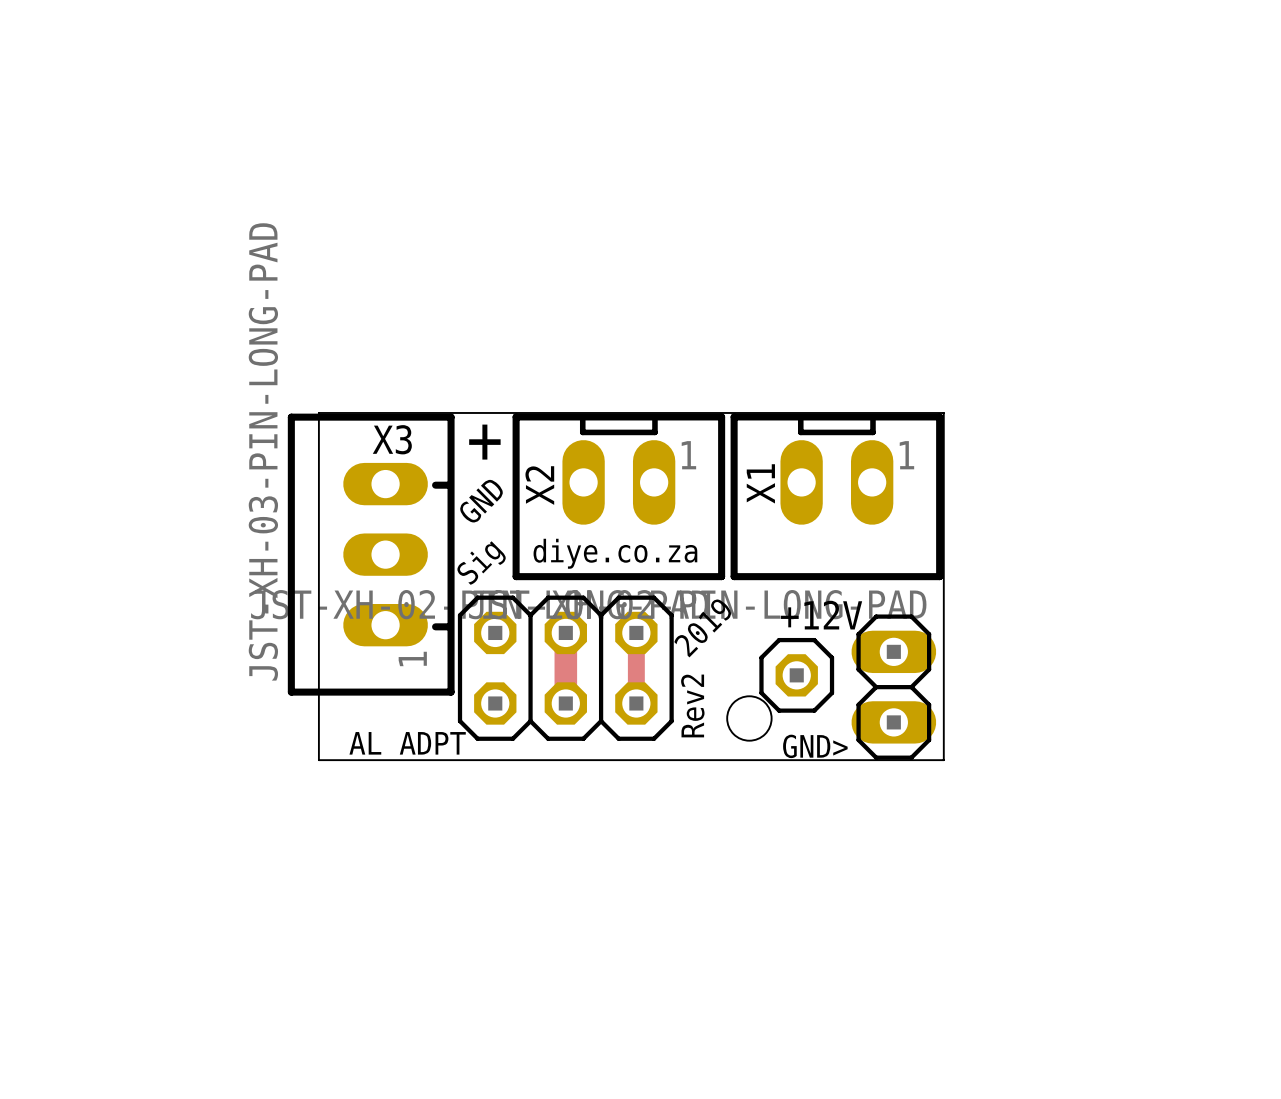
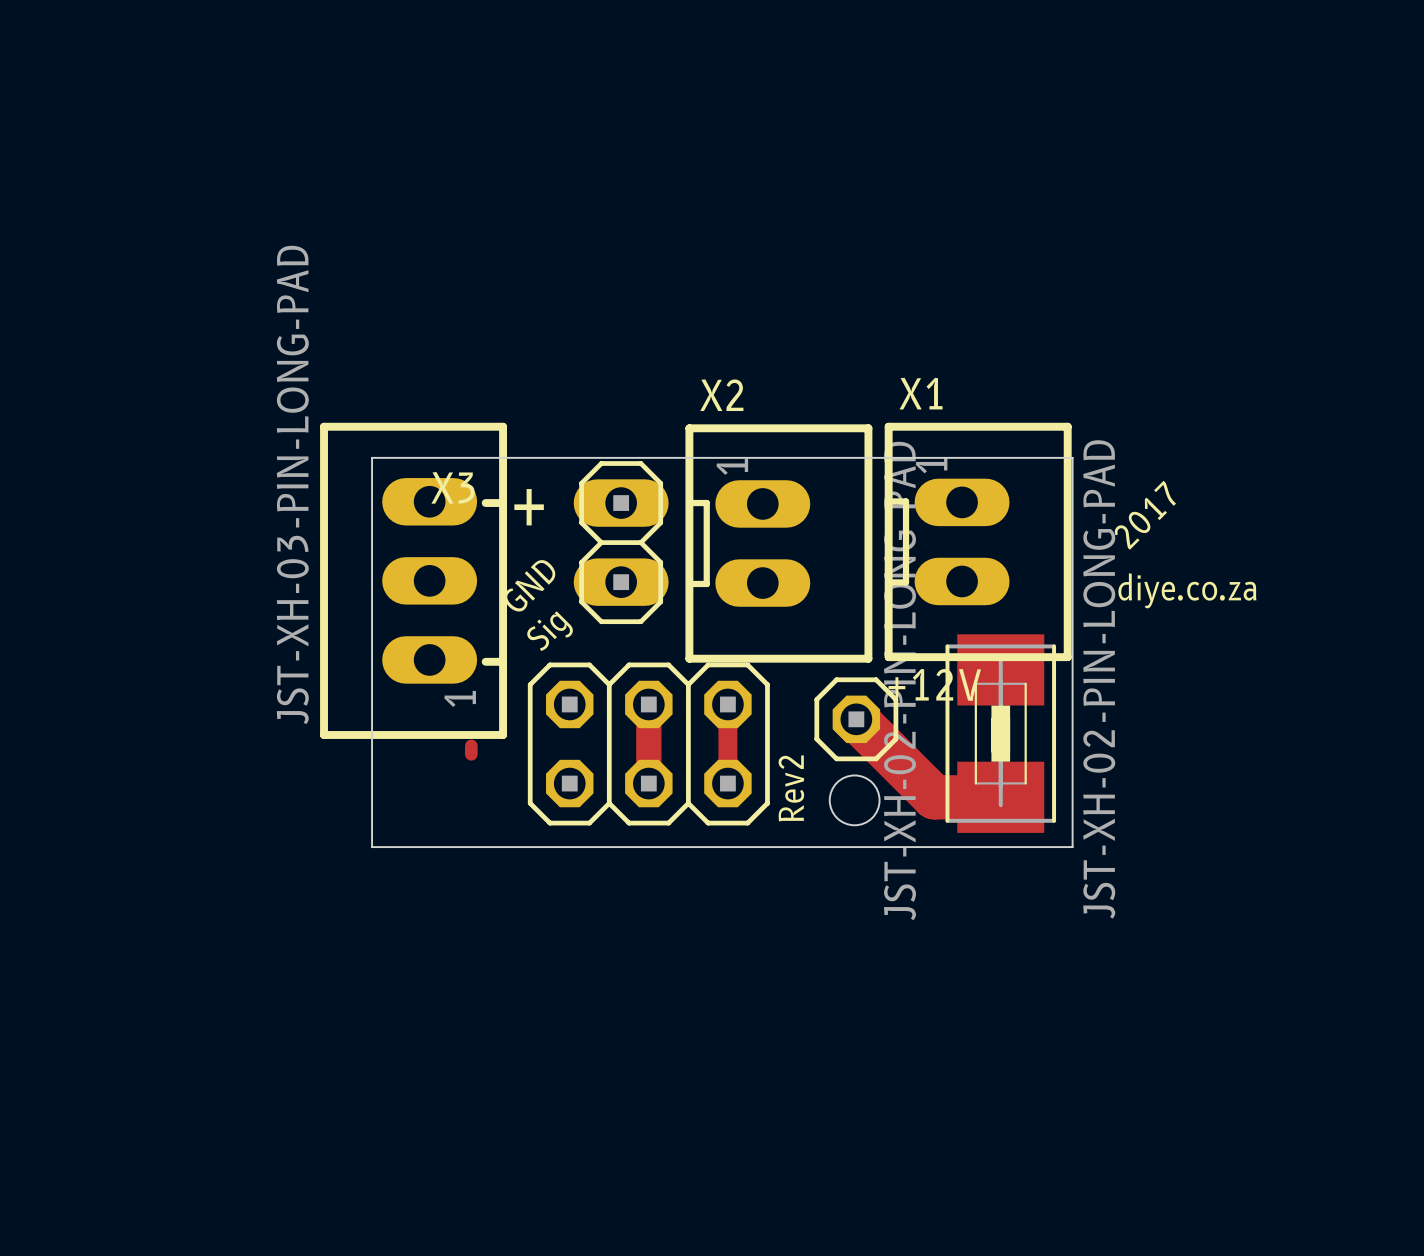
text position: + (484, 442) -> + (529, 507)
text: none -> 2017 (1145, 515)
X1 name position: X1 (760, 483) -> X1 (921, 393)
X2 name position: X2 (539, 485) -> X2 (721, 395)
X2 rotation: 0° (618, 496) -> 90° counterclockwise (778, 543)
X1 rotation: 0° (836, 496) -> 90° counterclockwise (978, 541)
text position: GND (481, 501) -> GND (529, 585)
text position: diye.co.za (615, 553) -> diye.co.za (1187, 590)
X3 position: (371, 554) -> (413, 580)
text: 2019 (702, 628) -> none
track: none -> (856, 719) (934, 797) (1000, 797)
part: none -> (1000, 733)
track: none -> (471, 745) (471, 754)
part position: (796, 675) -> (856, 719)
part position: (893, 687) -> (621, 542)
text: AL ADPT (407, 743) -> none
text: GND> (815, 746) -> none

